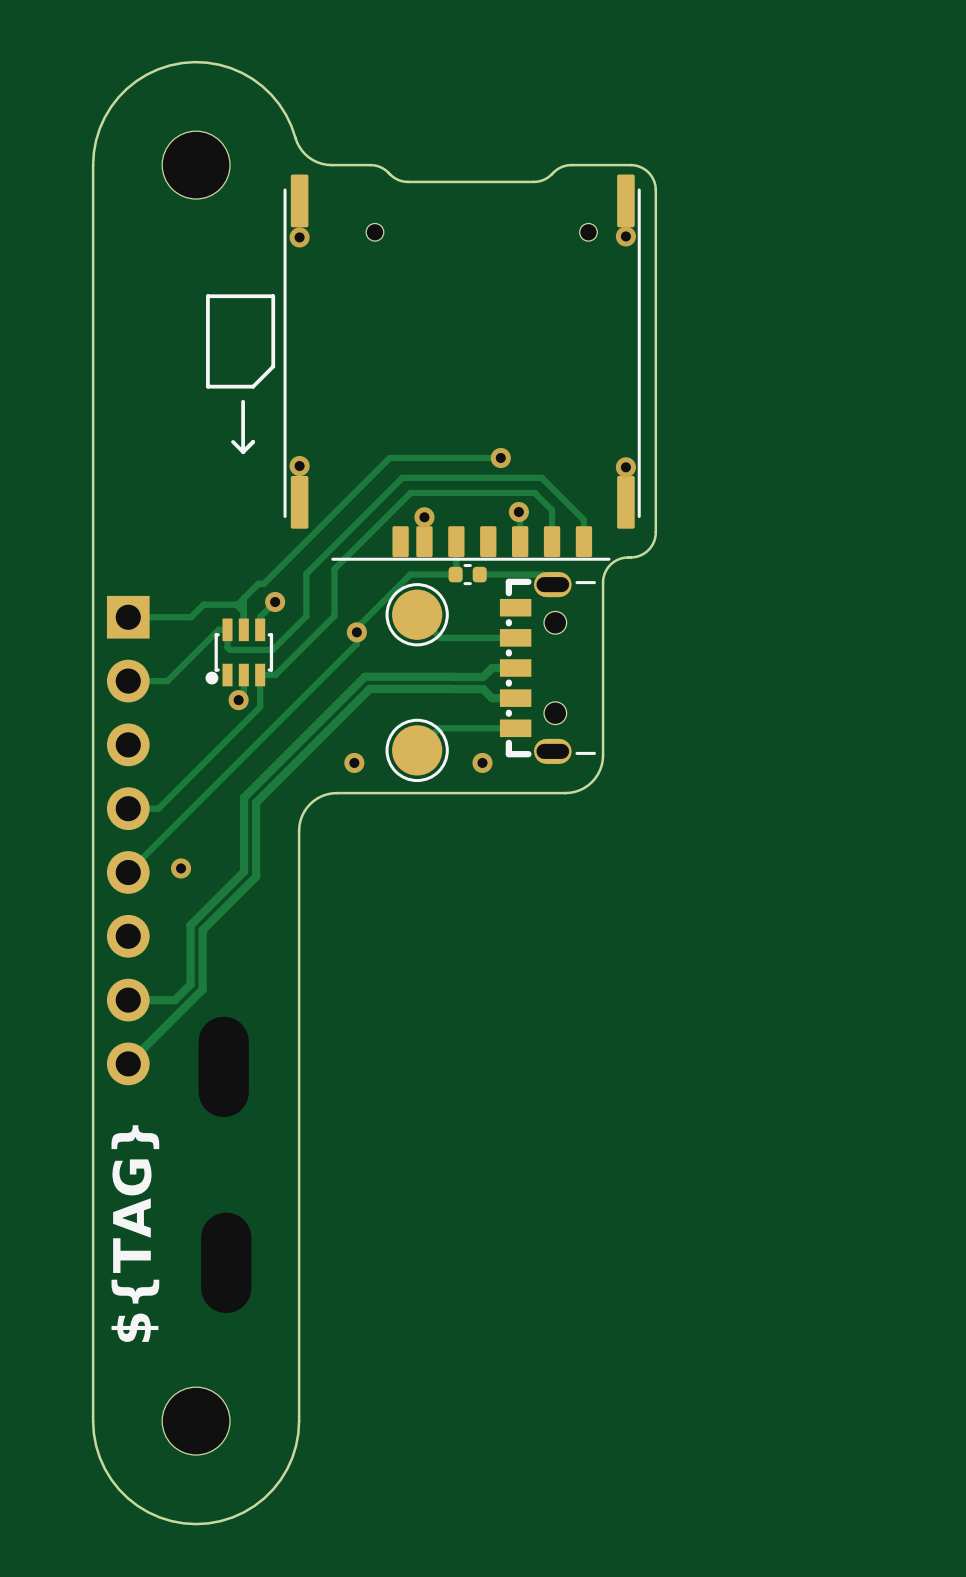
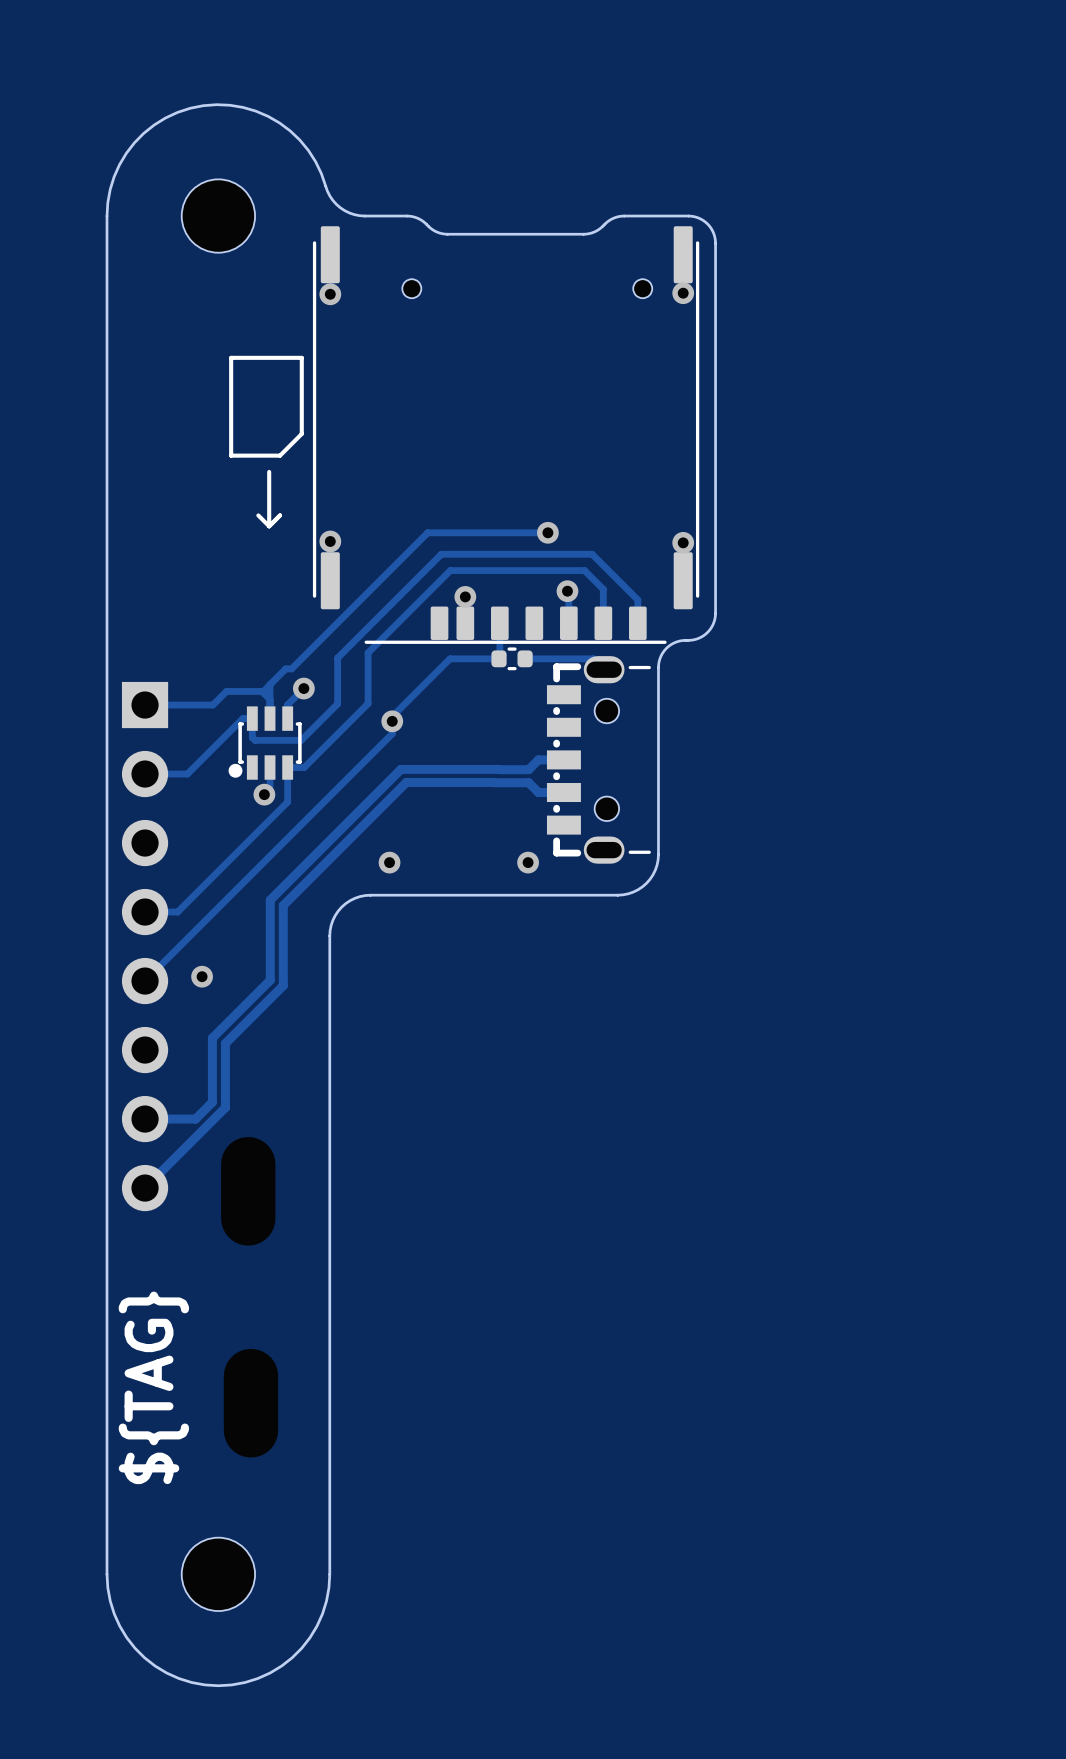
track: (417, 614) (440, 637) (515, 637) -> none
part: (417, 614) -> none
track: (515, 728) (439, 728) (417, 750) -> none
part: (417, 750) -> none

